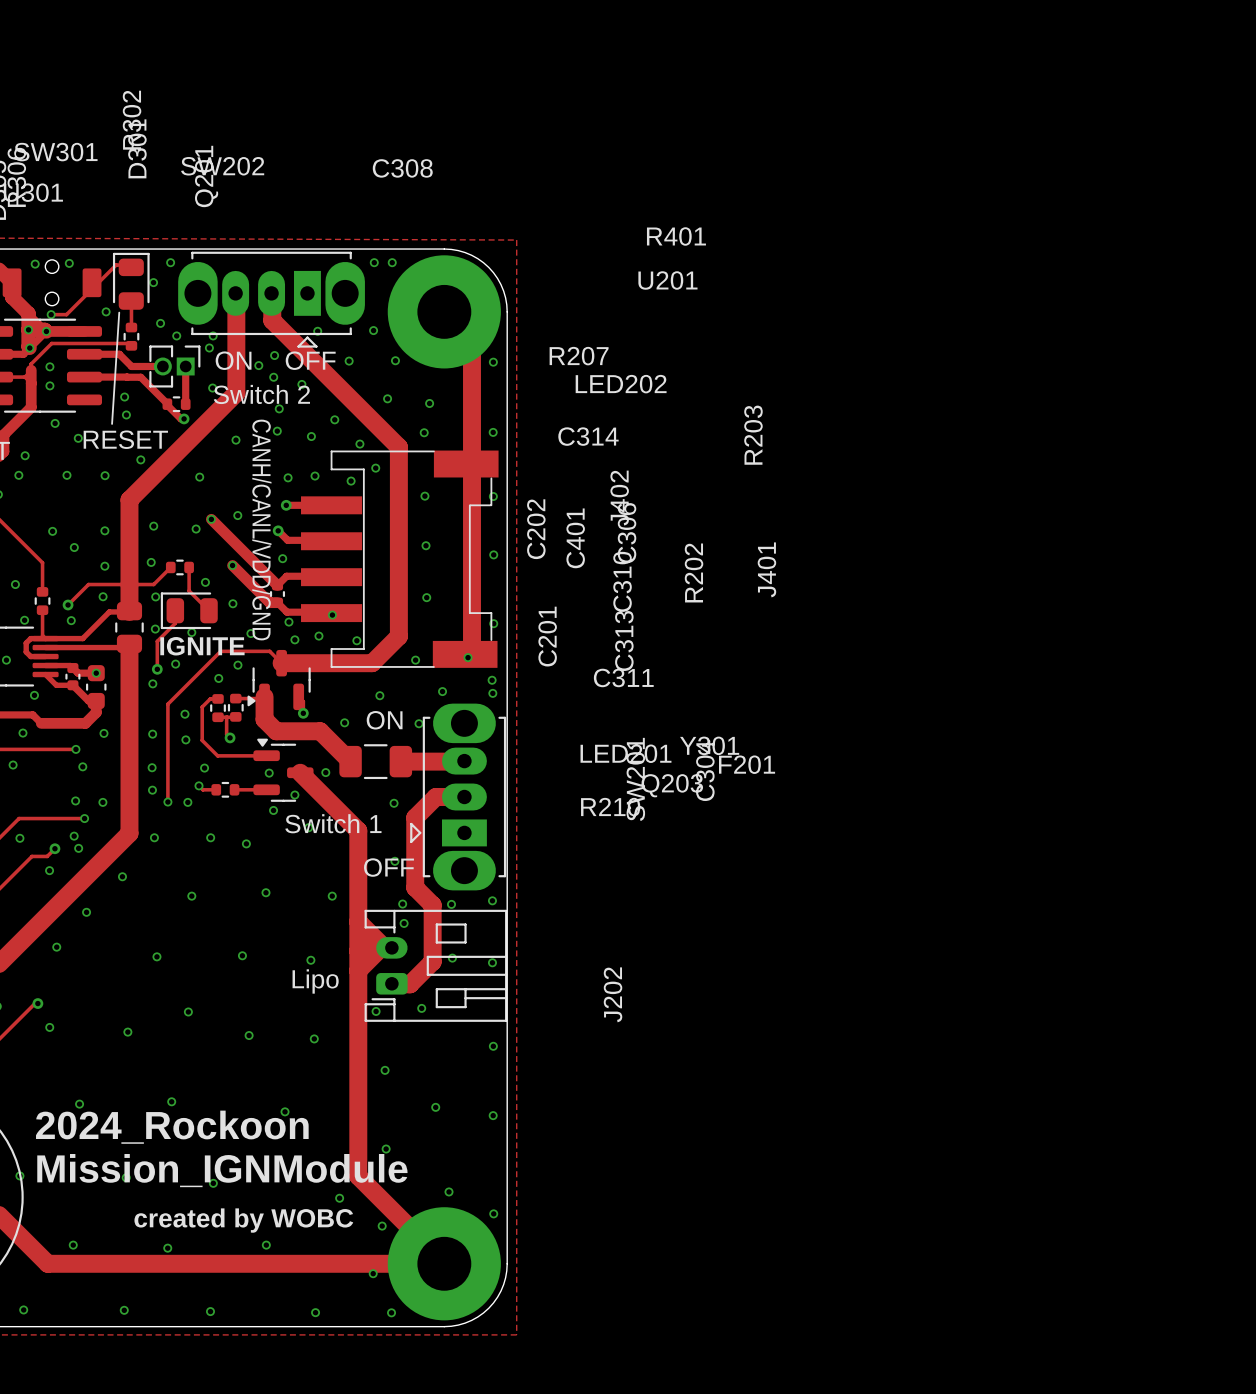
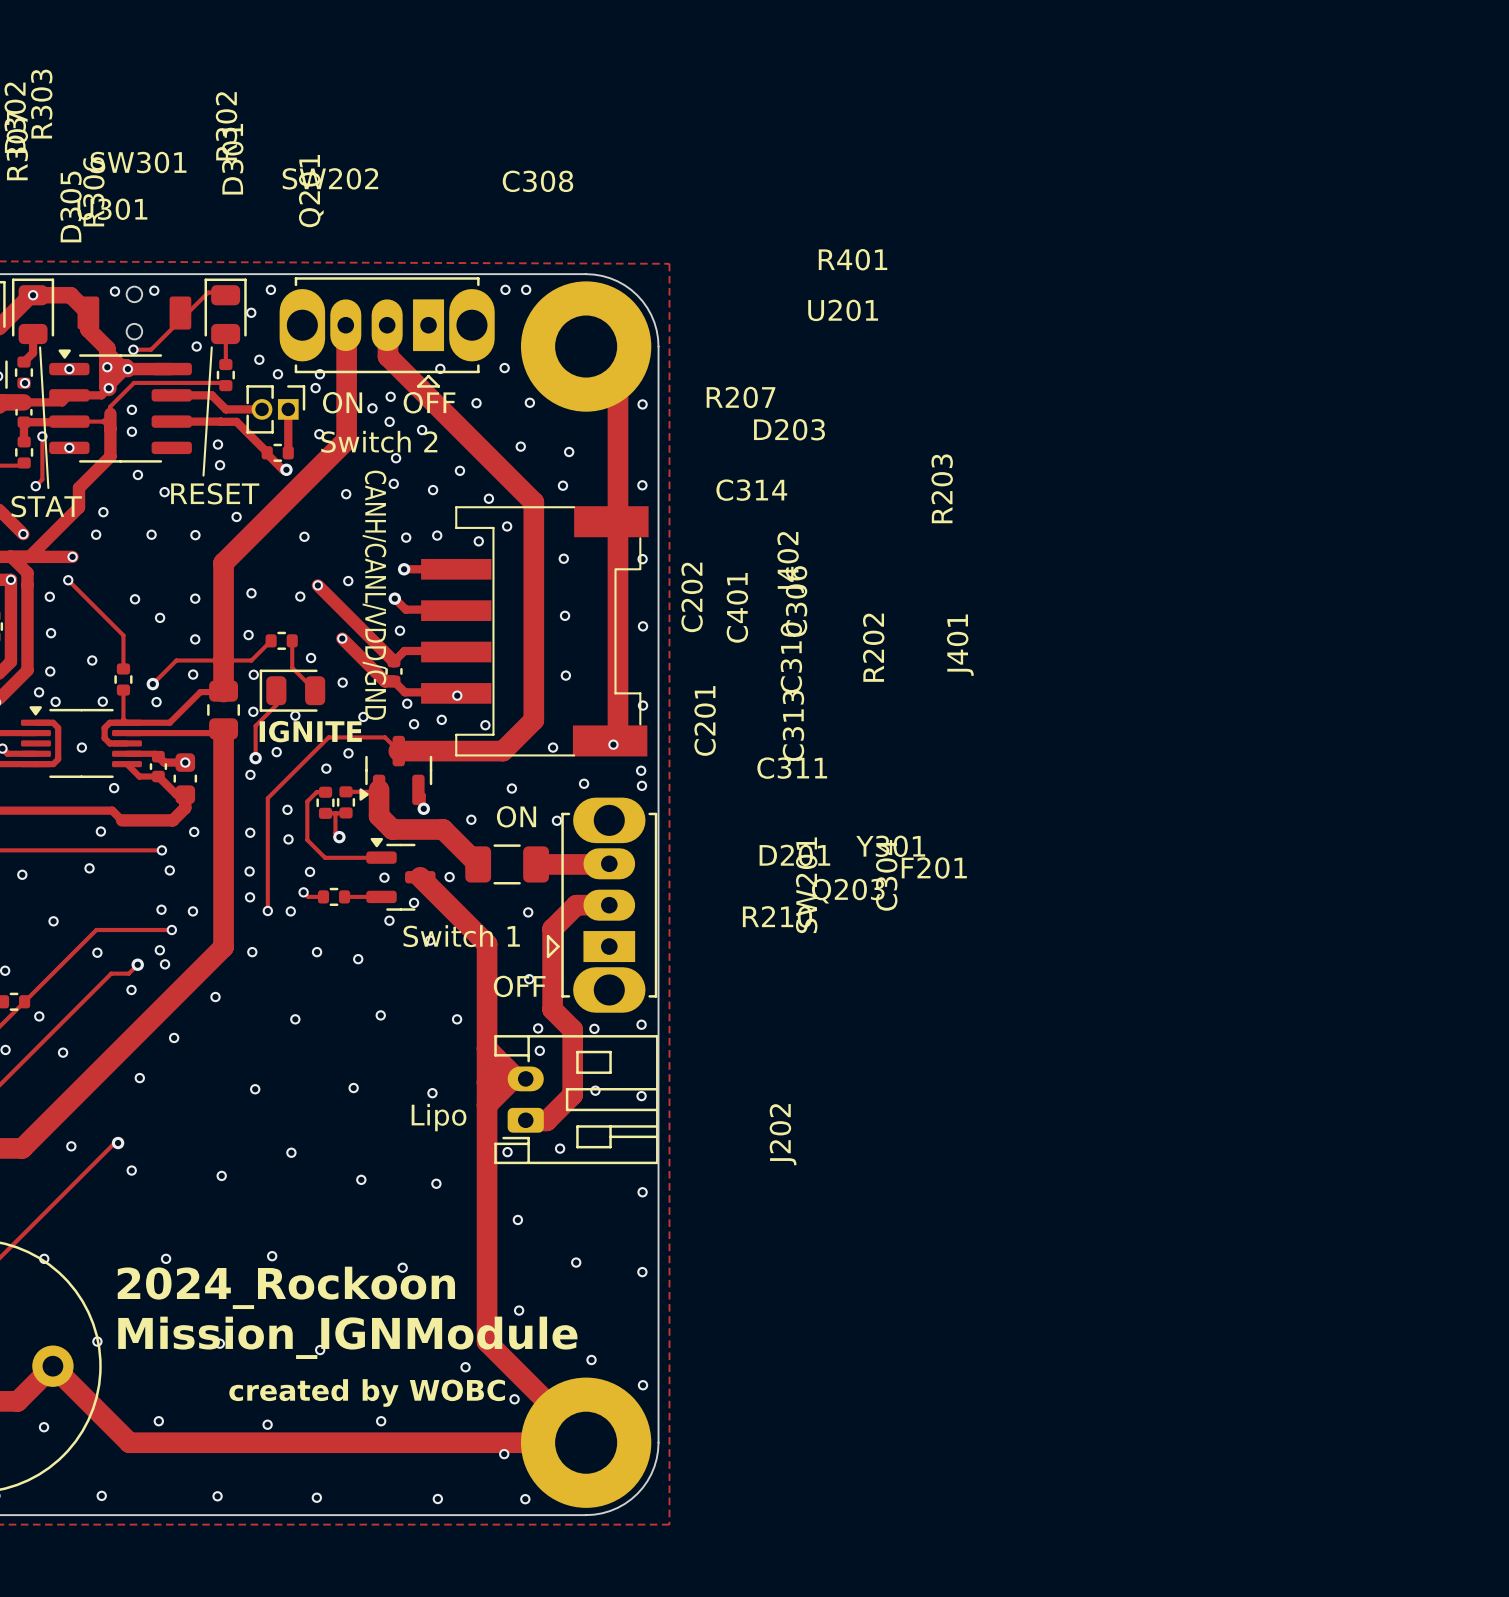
LED202 name: LED202 (621, 384) -> D203 (789, 429)
LED201 name: LED201 (625, 753) -> D201 (794, 855)

